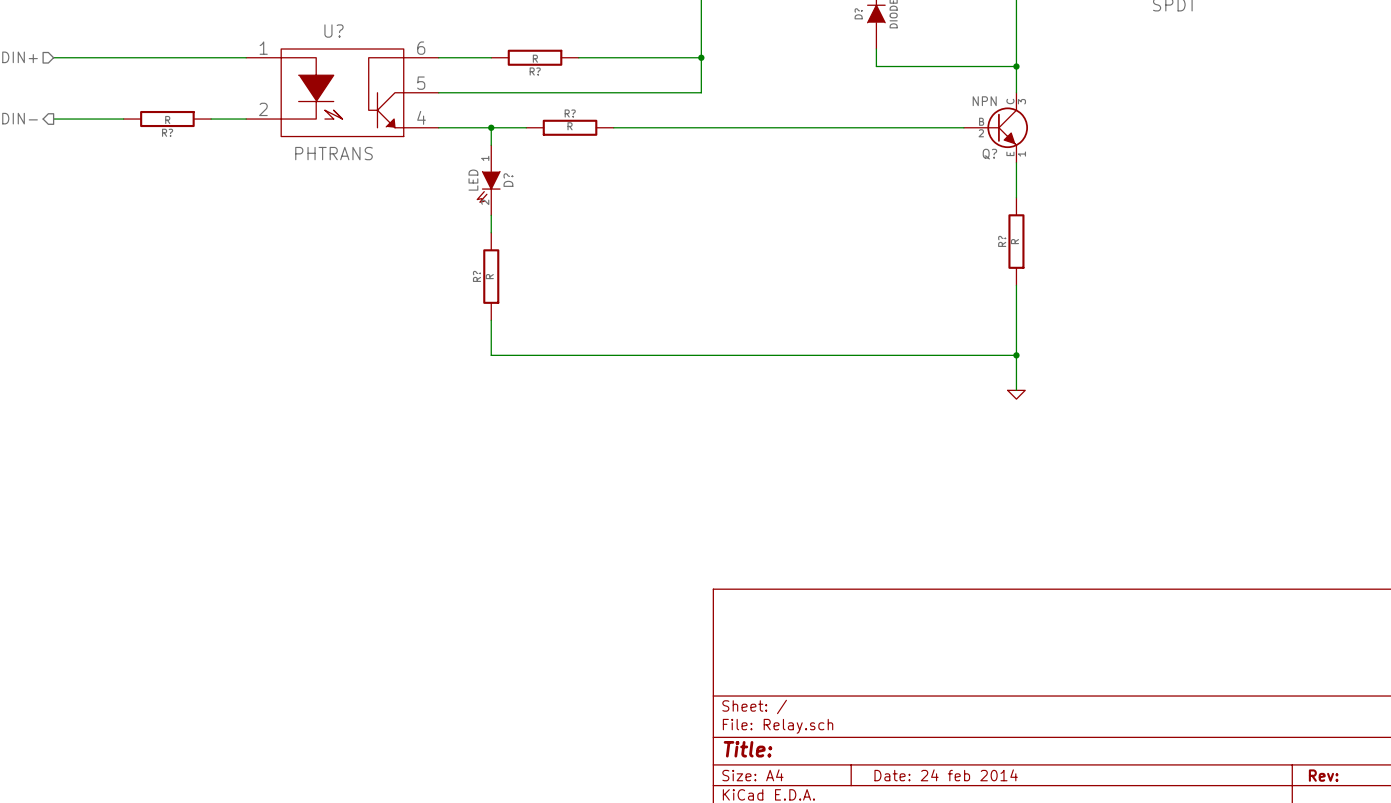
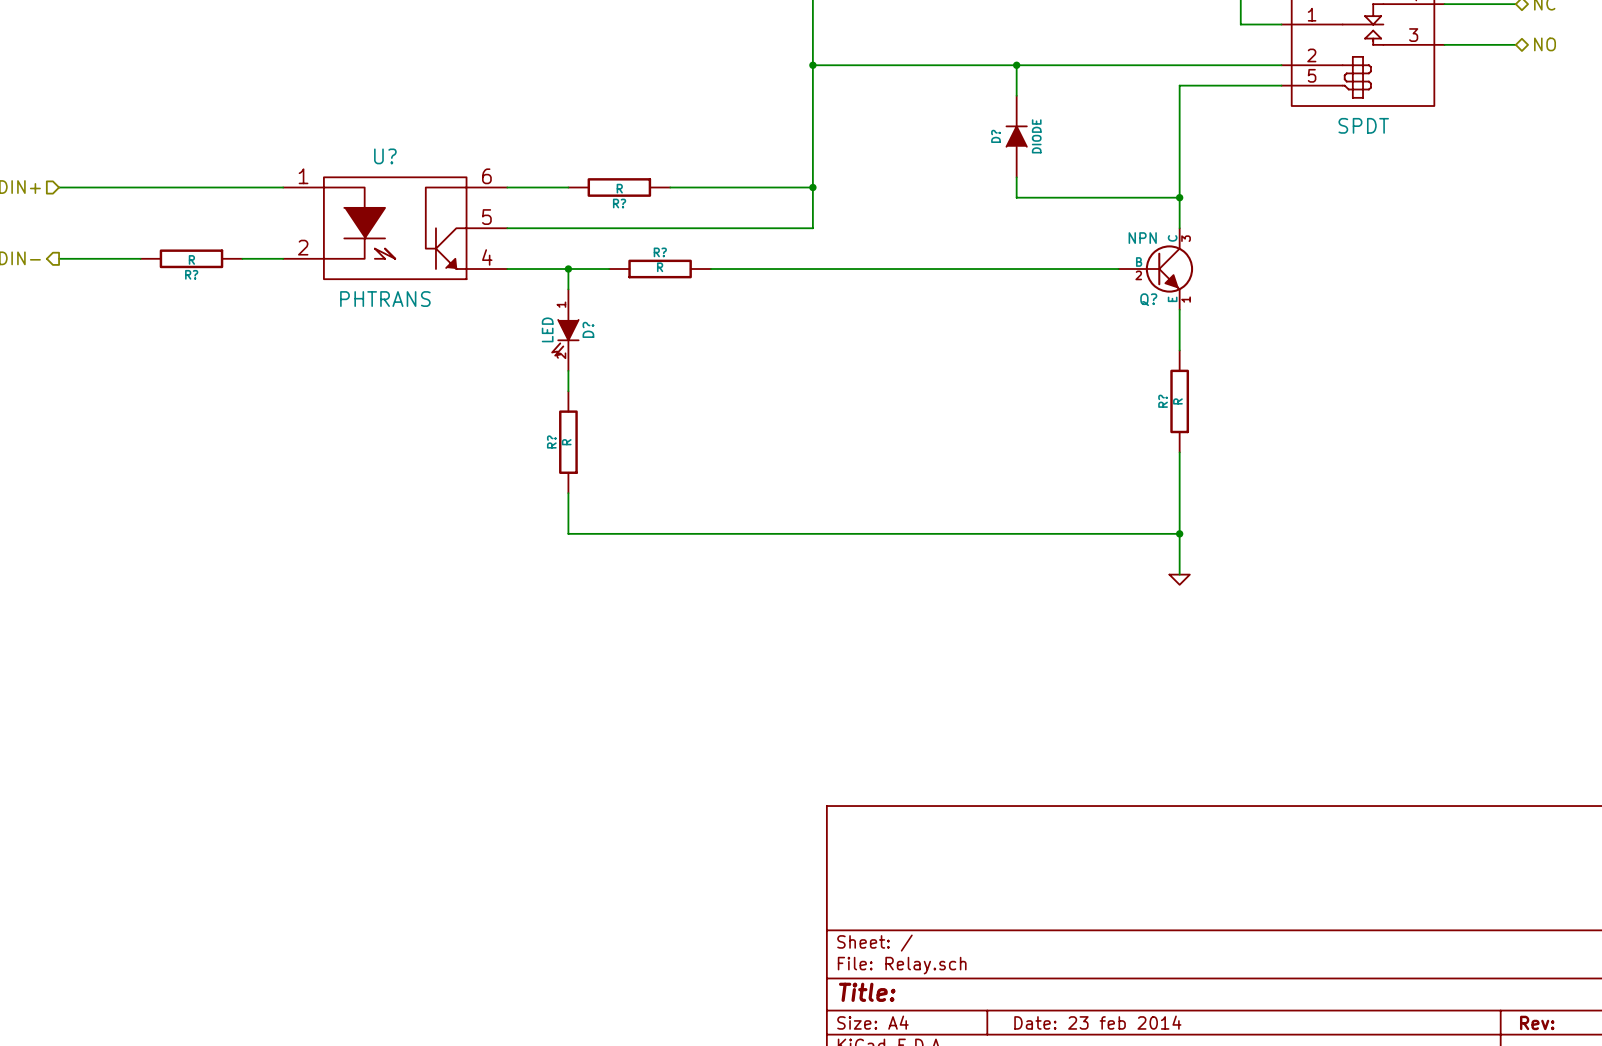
title block: Date: 24 feb 2014 (946, 775) -> Date: 23 feb 2014 (1097, 1022)

